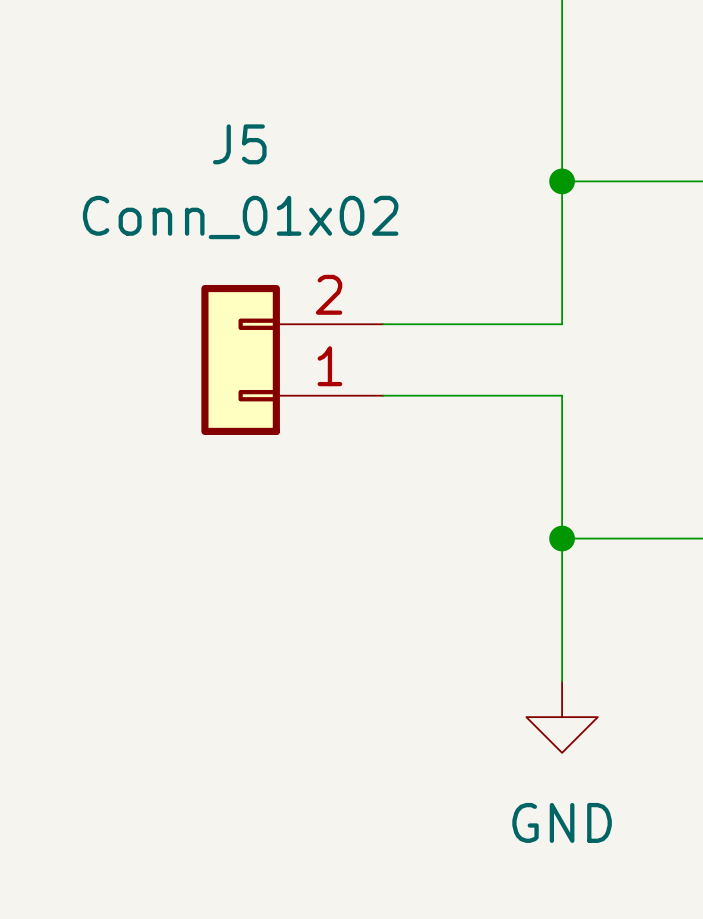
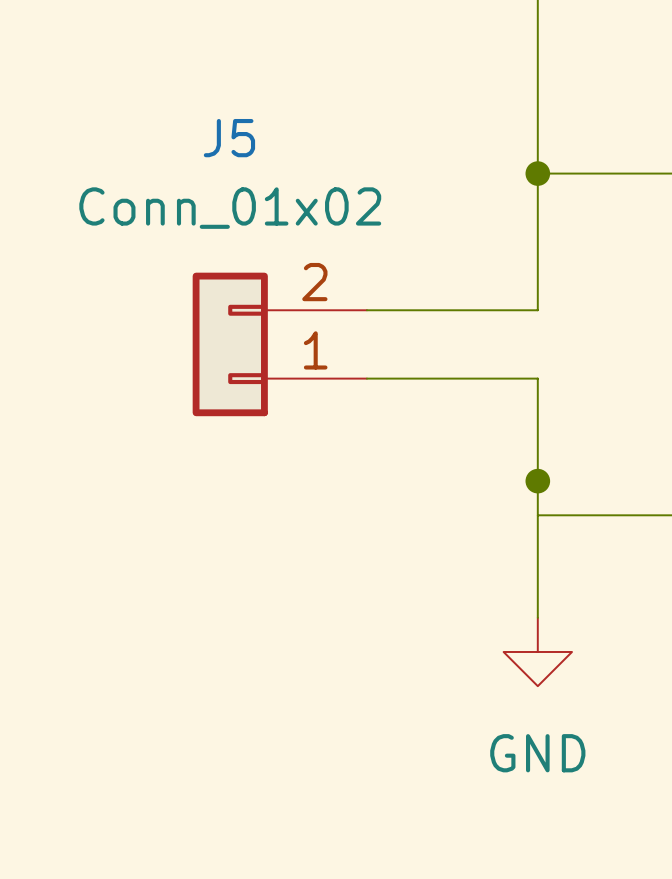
junction position: (562, 538) -> (537, 481)
power symbol position: GND (562, 717) -> GND (537, 651)

